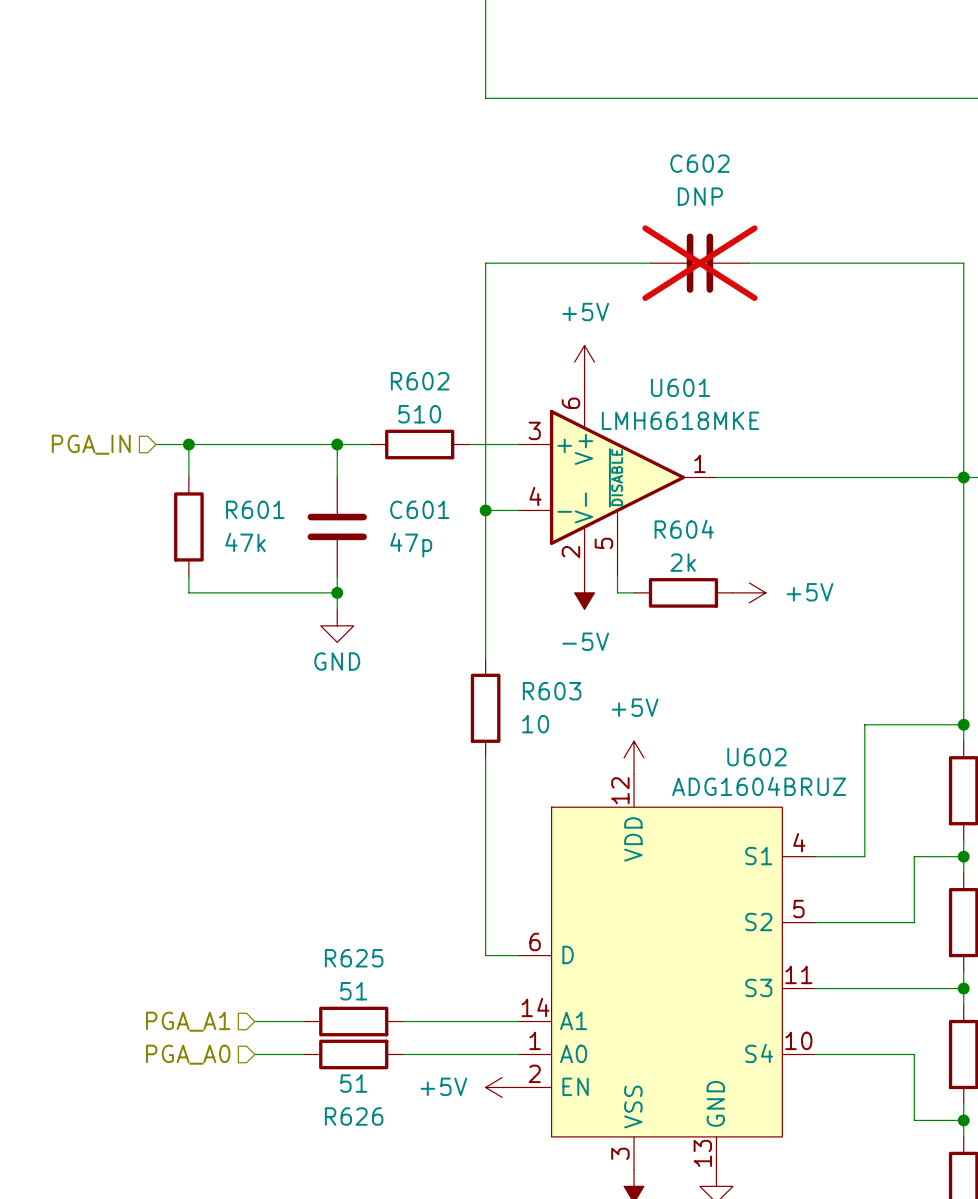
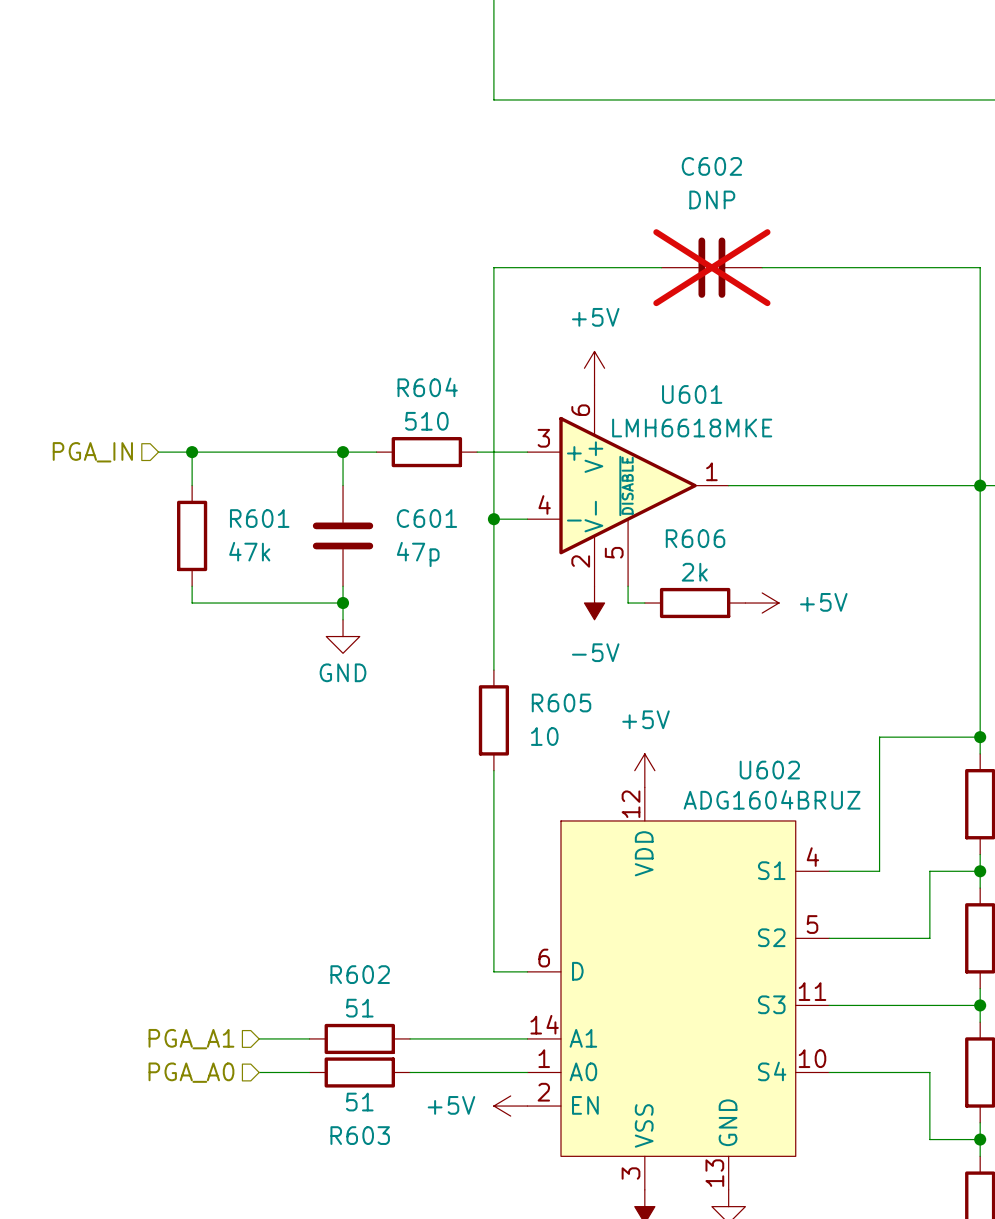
R602 name: R602 (420, 381) -> R604 (427, 387)
R604 name: R604 (684, 529) -> R606 (695, 538)
R603 name: R603 (552, 691) -> R605 (561, 702)
R625 name: R625 (354, 958) -> R602 (360, 974)
R626 name: R626 (354, 1116) -> R603 (360, 1135)

